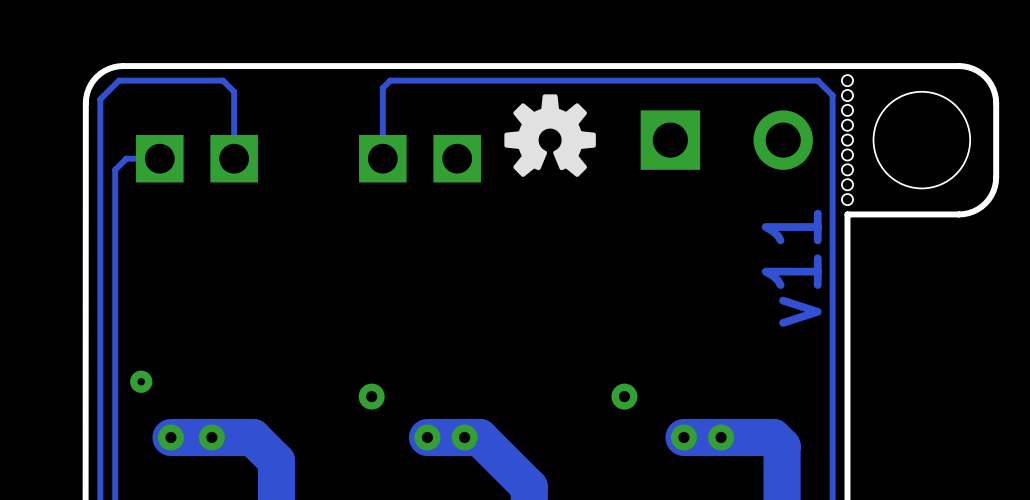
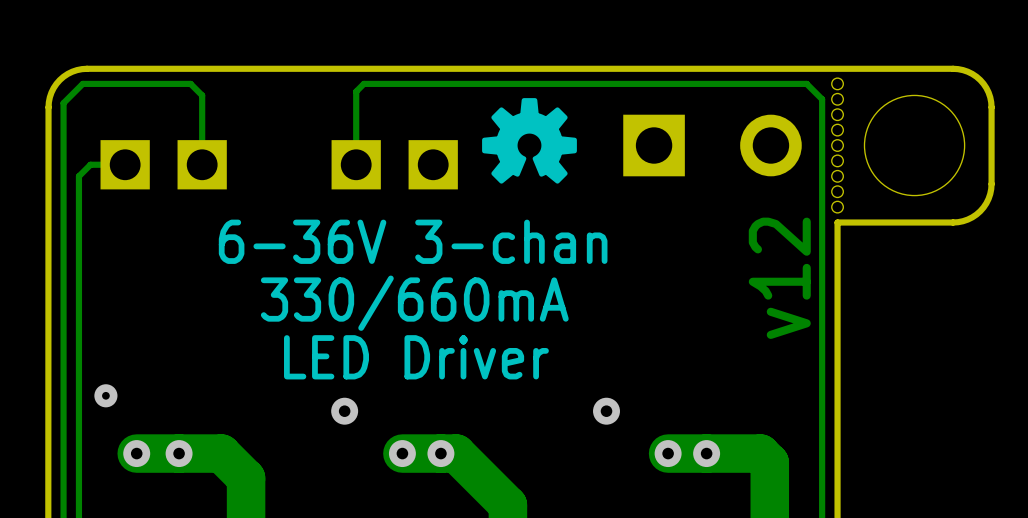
text: none -> 6-36V 3-chan (413, 241)
text: v11 (791, 268) -> v12 (779, 278)
text: none -> 330/660mA (414, 303)
text: none -> LED Driver (416, 357)

